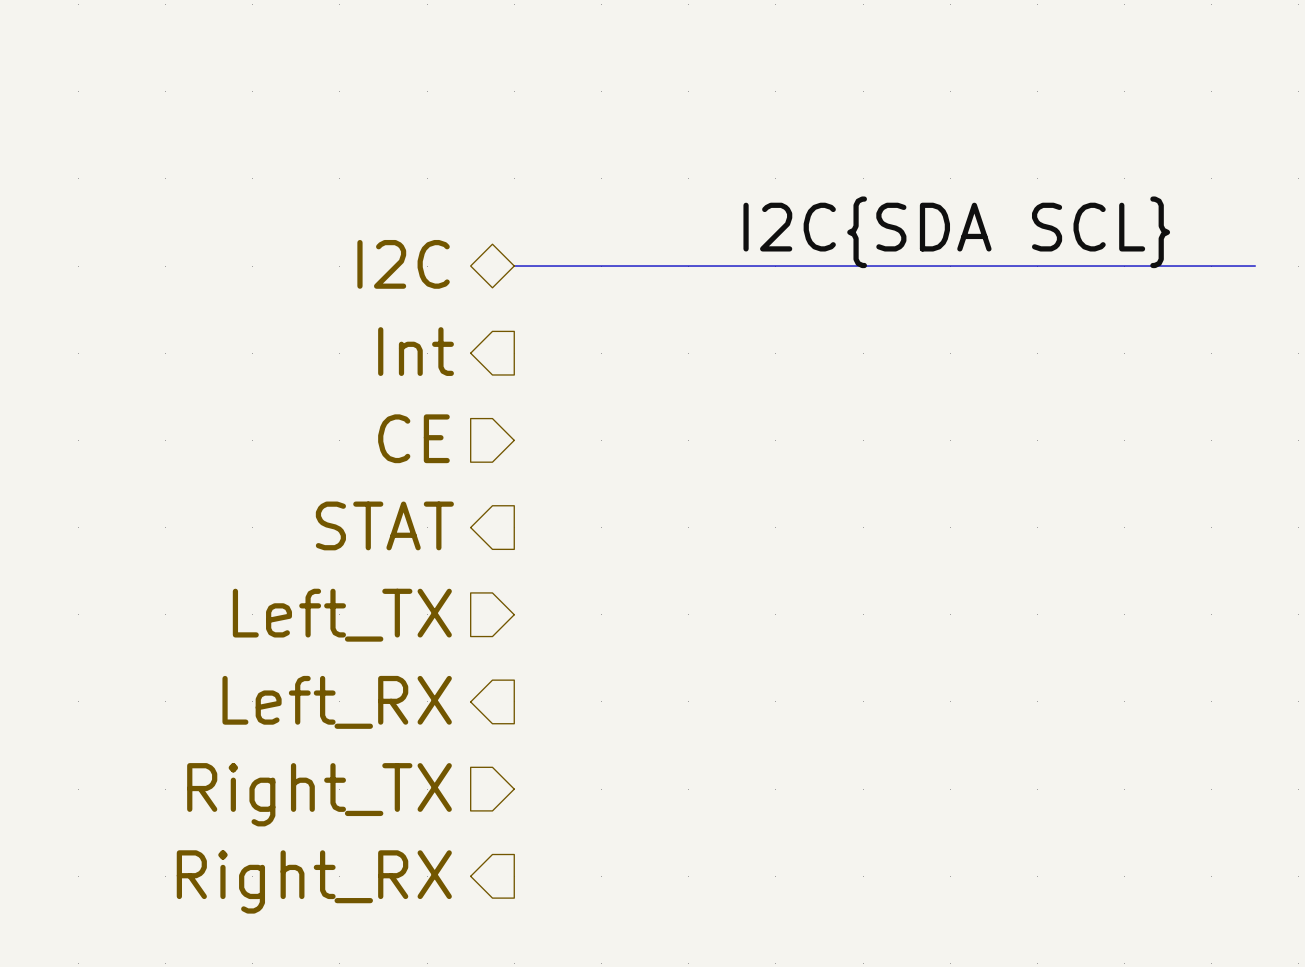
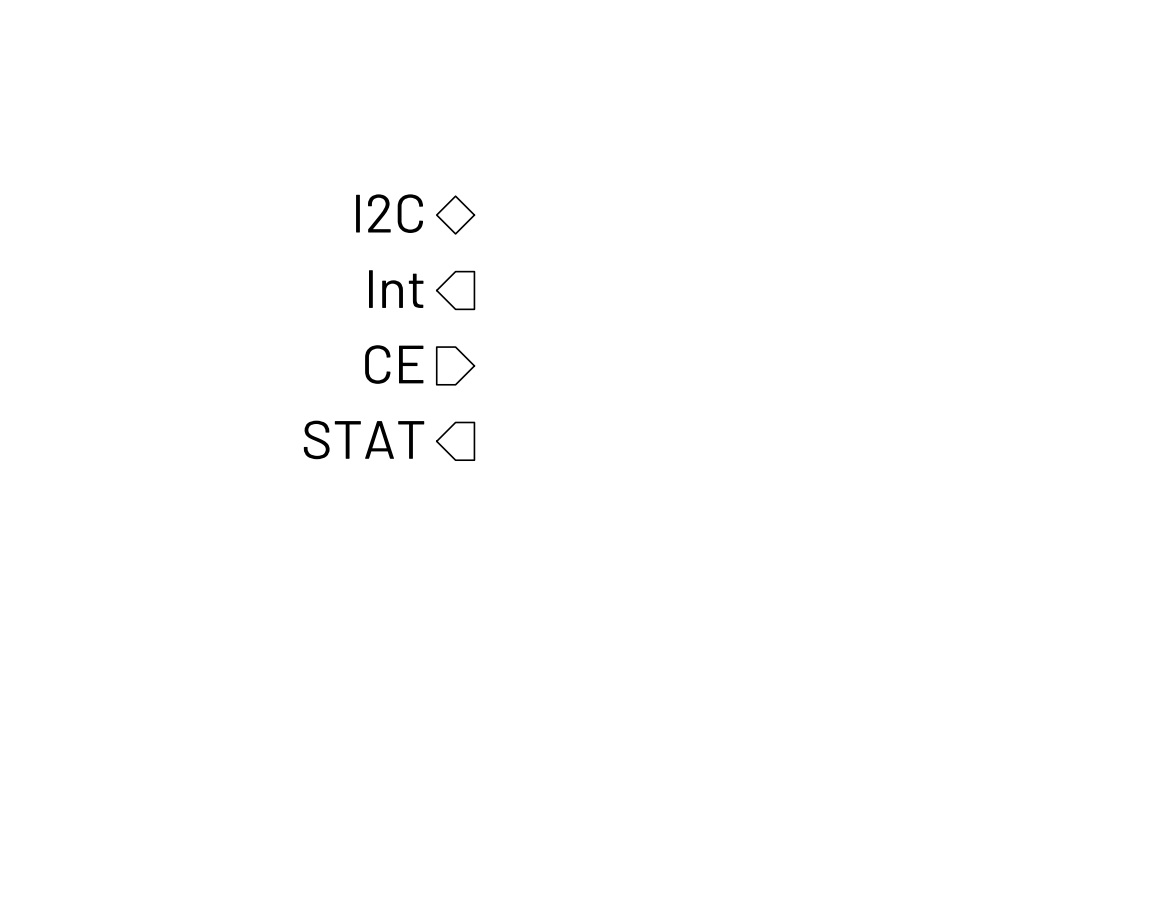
label: I2C{SDA SCL} (956, 232) -> none
bus: (514, 266) (1255, 266) -> none
hierarchical label: Left_TX (342, 615) -> none
hierarchical label: Left_RX (337, 702) -> none
hierarchical label: Right_TX (319, 794) -> none
hierarchical label: Right_RX (314, 881) -> none

